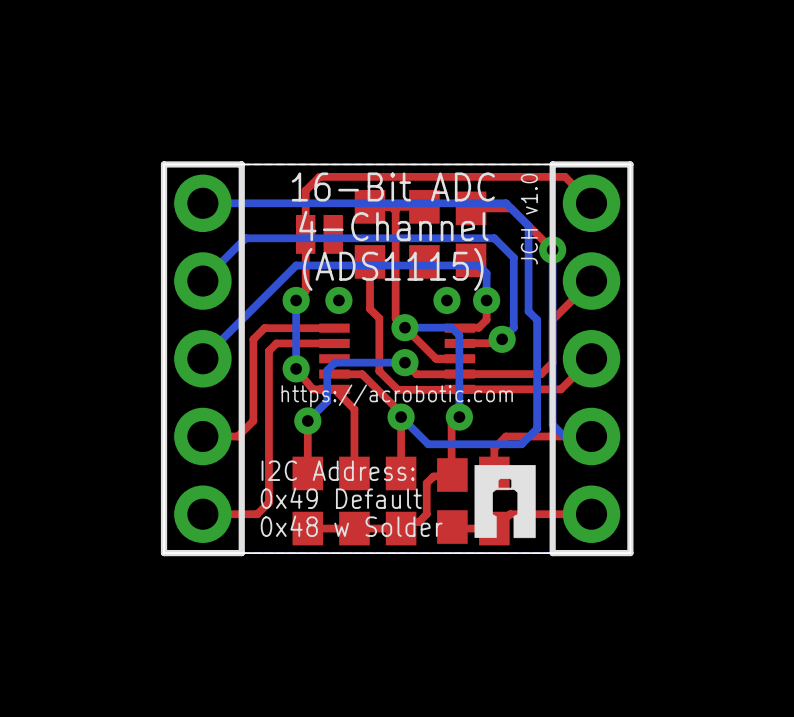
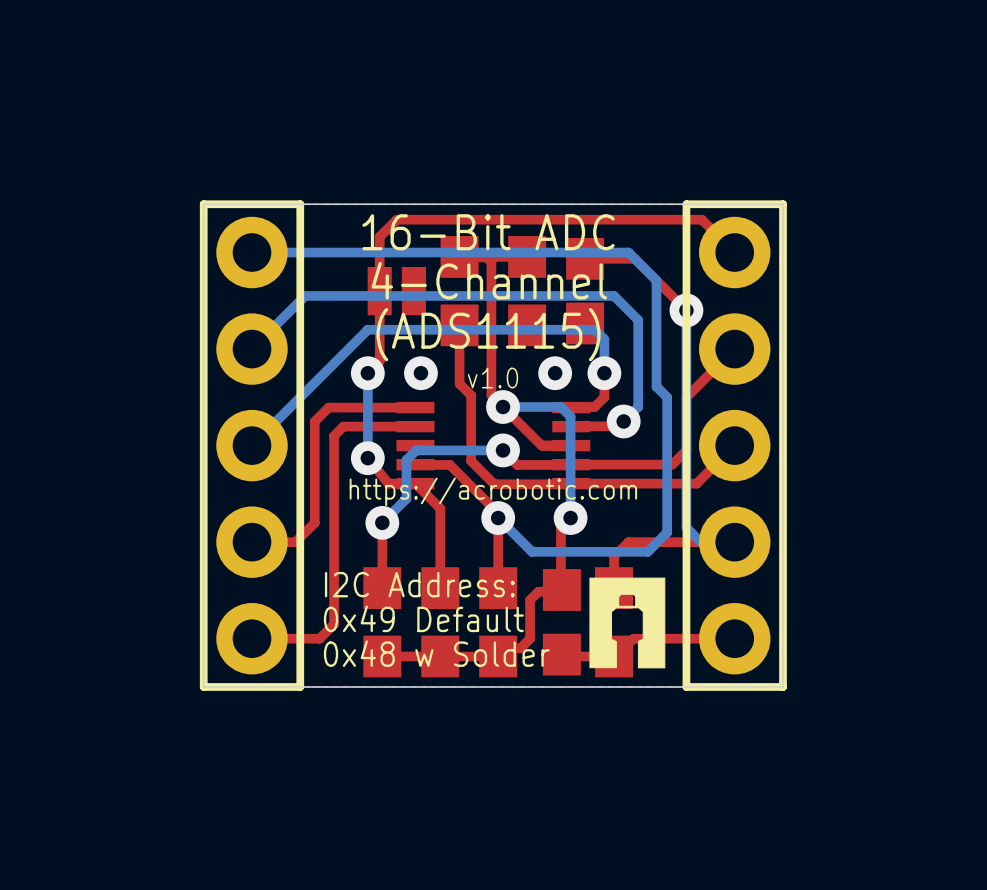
text: JCH v1.0 (529, 219) -> none
text: none -> v1.0 (492, 378)

